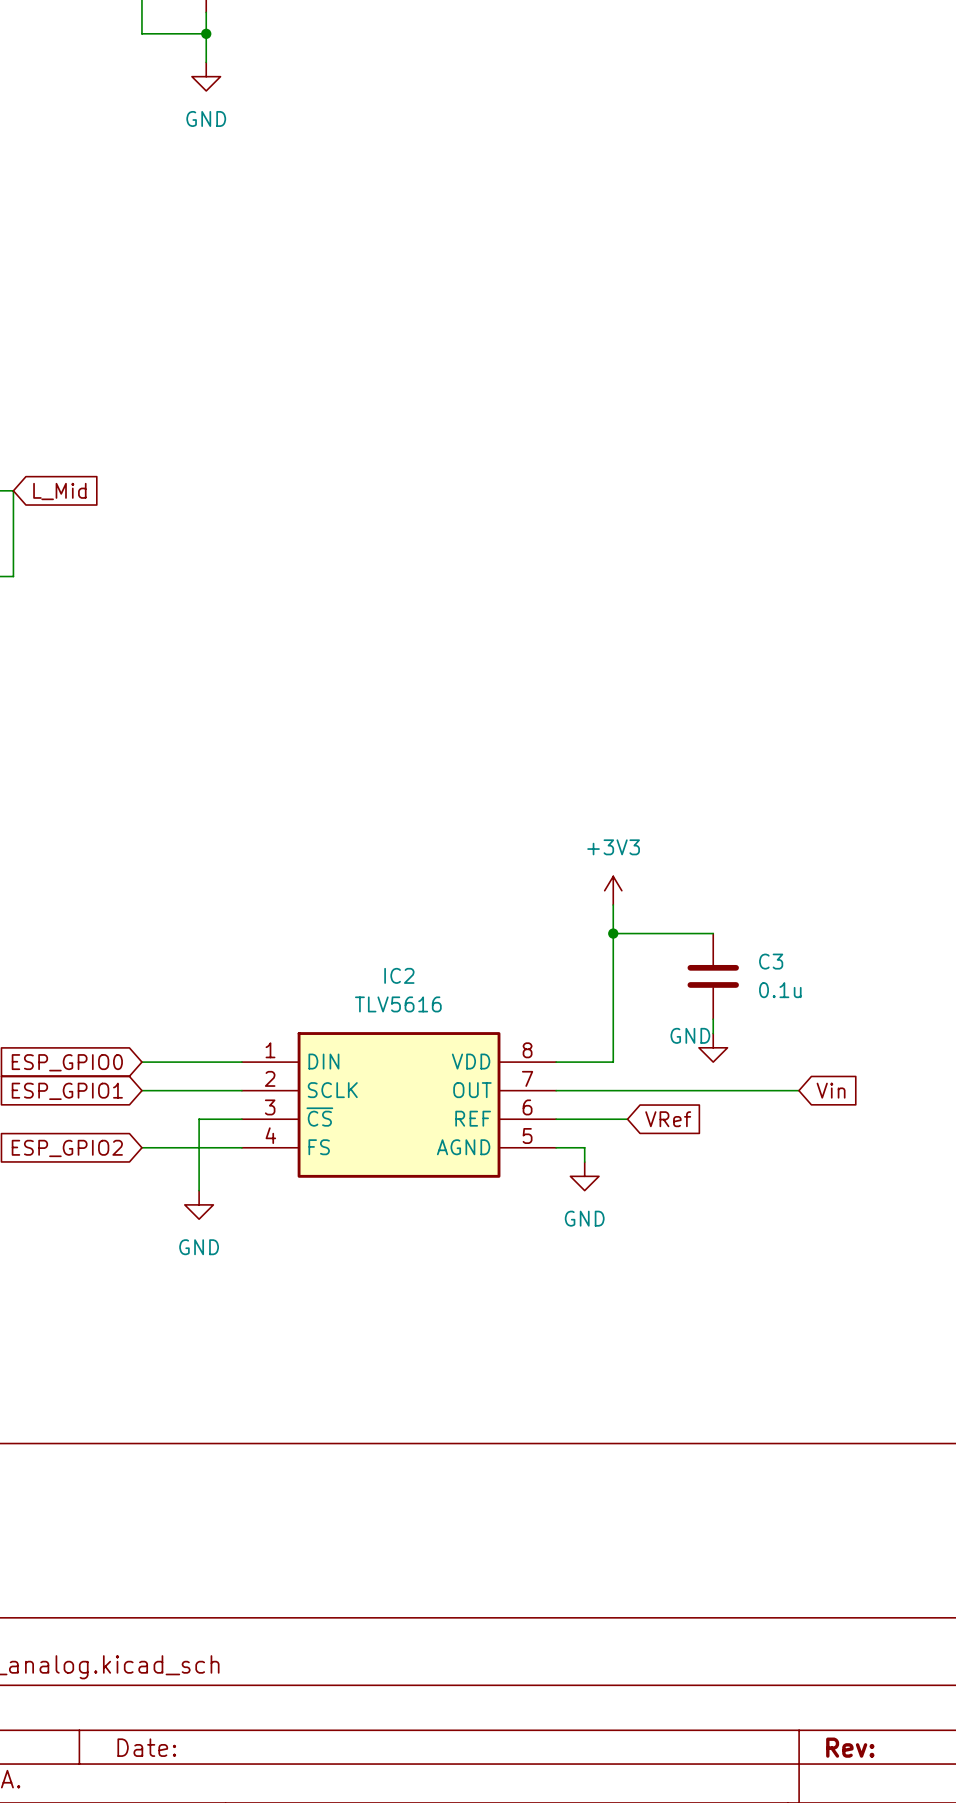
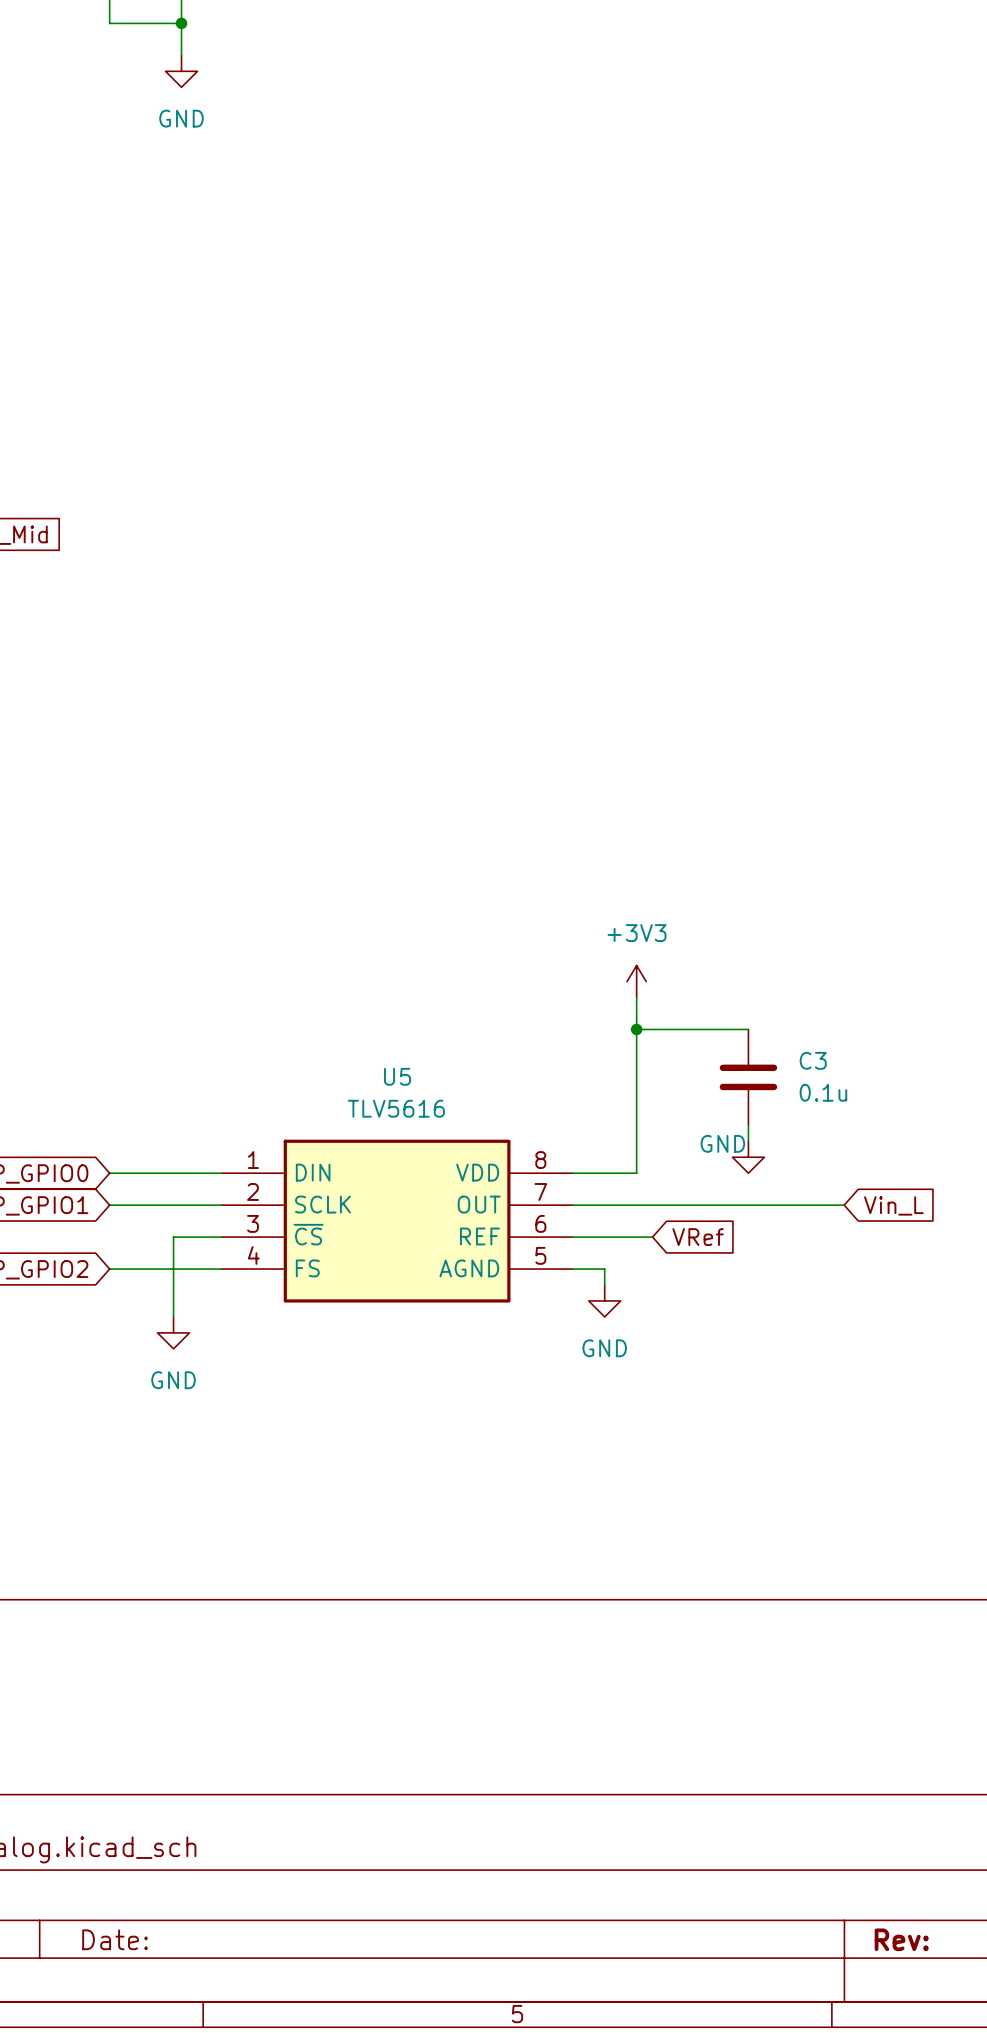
IC2 name: IC2 (399, 975) -> U5 (397, 1076)
global label: Vin (831, 1090) -> Vin_L (893, 1205)

